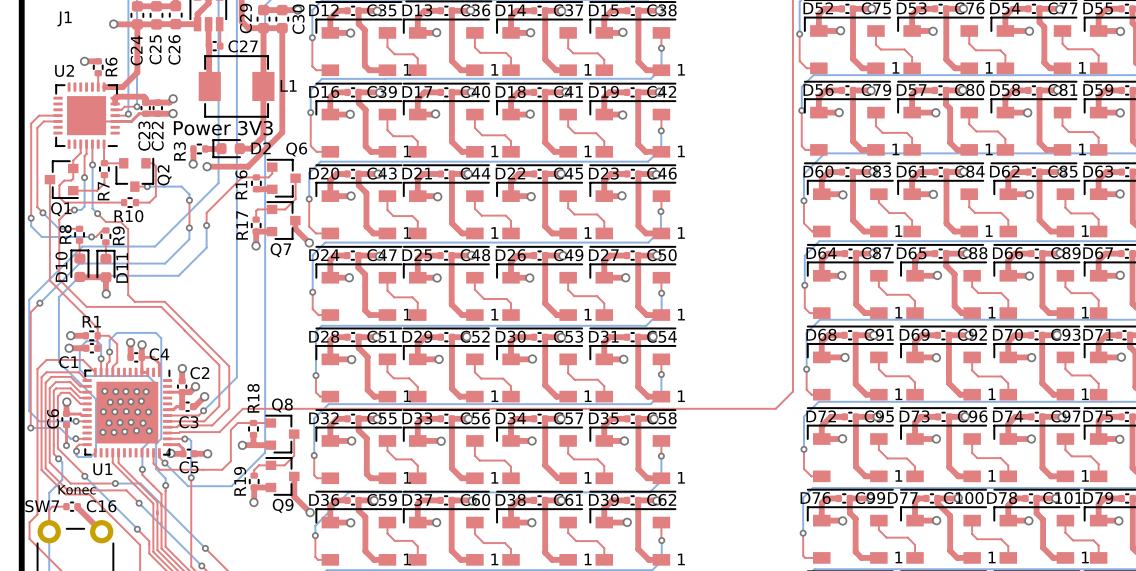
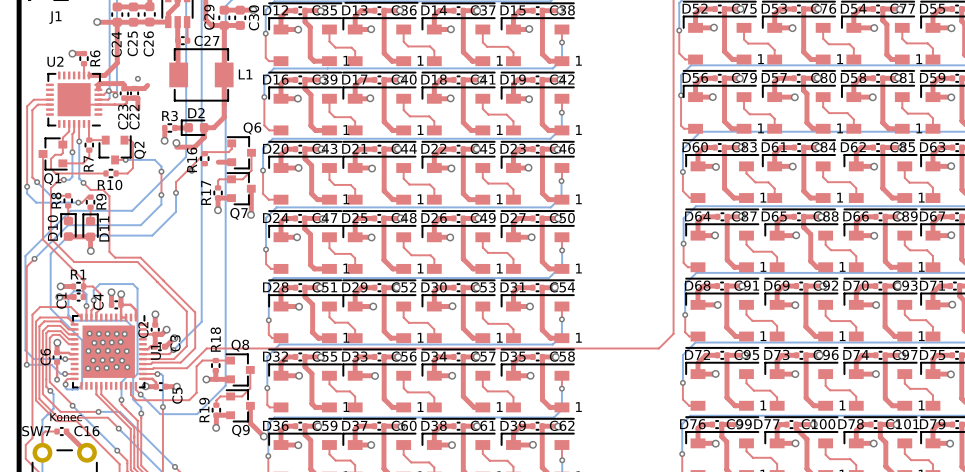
top track: (282, 28) (282, 132) (248, 166) (207, 166) -> none
via: none -> (137, 78)
via: (173, 98) -> none
via: none -> (108, 91)
via: (137, 106) -> none
via: none -> (115, 95)
top track: none -> (126, 98) (137, 98) (137, 108)
top track: (172, 113) (139, 113) (131, 121) -> (126, 98) (125, 104) (112, 104)
via: (173, 113) -> none
via: (128, 114) -> none
text: Power 3V3 (223, 128) -> none
top track: none -> (204, 127) (204, 137) (194, 147) (176, 147)
D2 name position: D2 (261, 148) -> D2 (196, 113)
R3 name rotation: 0° (179, 151) -> 90° clockwise (169, 116)
R16 position: (256, 183) -> (204, 158)
via: none -> (191, 170)
top track: (295, 228) (309, 242) -> (251, 195) (251, 214)
via position: (309, 242) -> (251, 214)
C4 name rotation: 0° (159, 354) -> 90° counterclockwise (98, 301)
C4 name position: C4 (159, 354) -> C4 (98, 301)
C1 name rotation: 0° (68, 362) -> 90° counterclockwise (61, 300)
C2 name rotation: 0° (199, 373) -> 90° counterclockwise (143, 329)
C2 name position: C2 (199, 373) -> C2 (143, 329)
C3 name rotation: 0° (188, 422) -> 90° counterclockwise (175, 343)
C5 name rotation: 0° (189, 467) -> 90° counterclockwise (177, 395)
U1 name rotation: 0° (102, 469) -> 90° counterclockwise (155, 351)
U1 name position: U1 (102, 469) -> U1 (155, 351)
bottom track: (652, 490) (649, 492) (348, 492) (315, 525) -> (554, 417) (274, 417) (268, 423) (268, 447)

